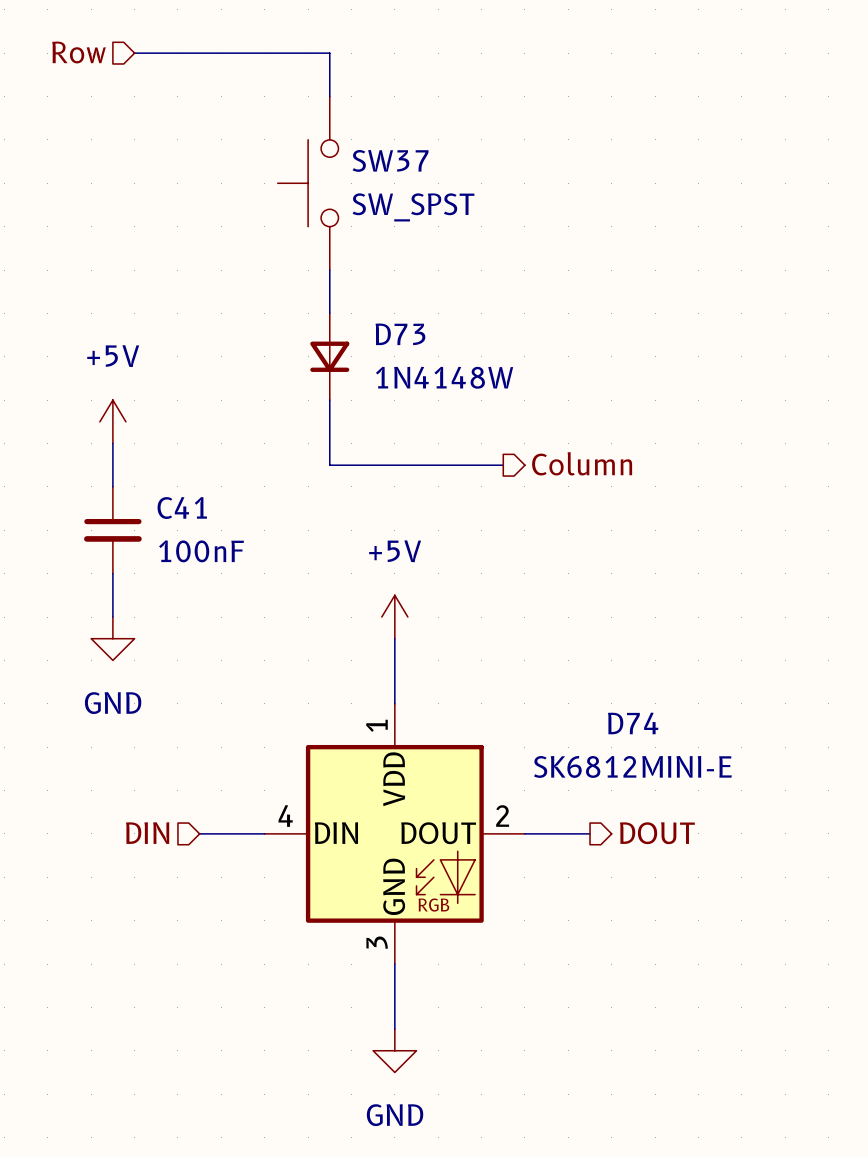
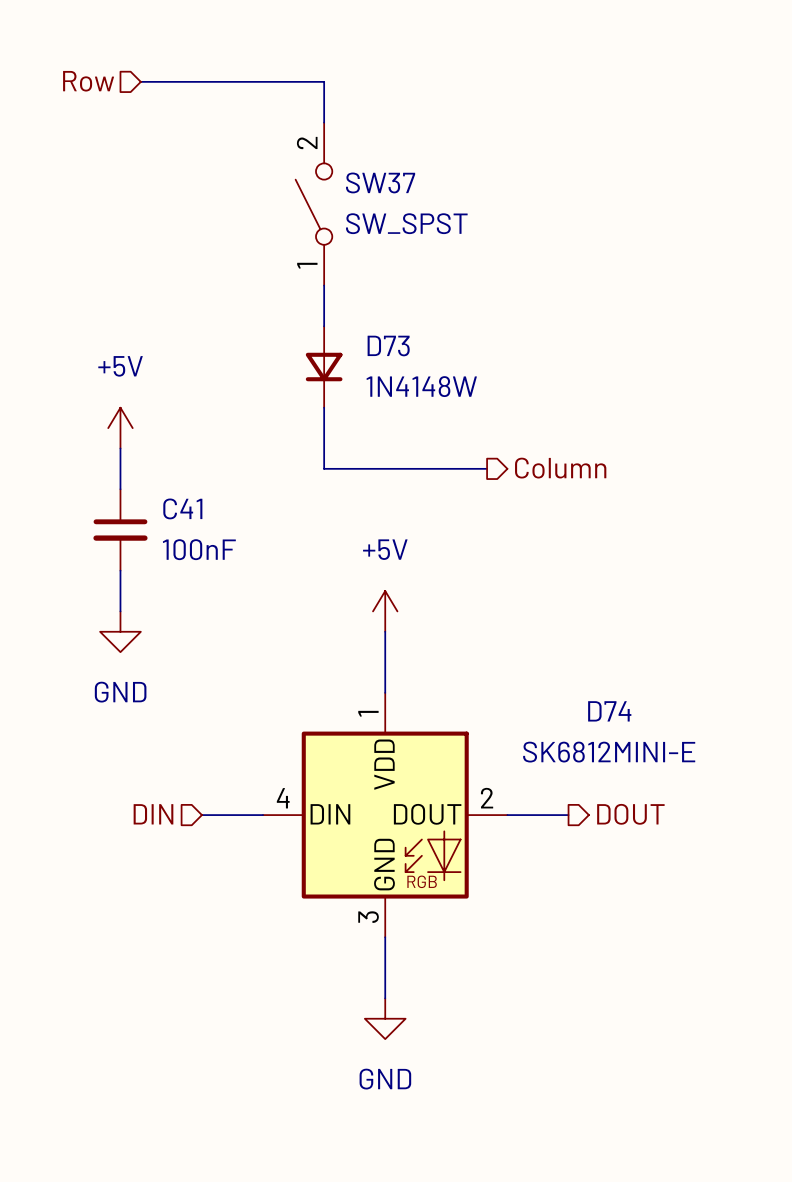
SW37 symbol: [277, 96, 339, 271] -> [295, 122, 333, 286]

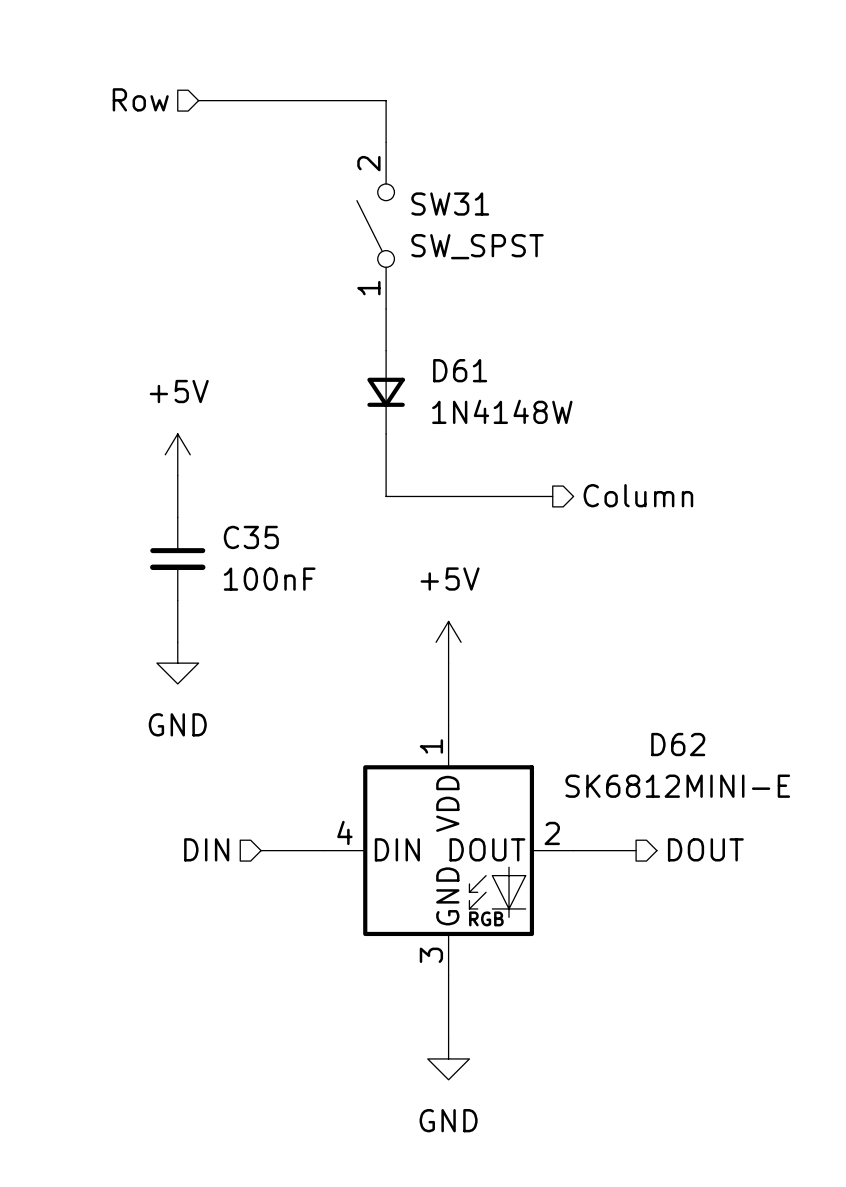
SW37 name: SW37 (380, 182) -> SW31 (450, 204)
D73 name: D73 (388, 346) -> D61 (460, 370)
C41 name: C41 (182, 508) -> C35 (251, 537)
D74 name: D74 (609, 711) -> D62 (678, 744)

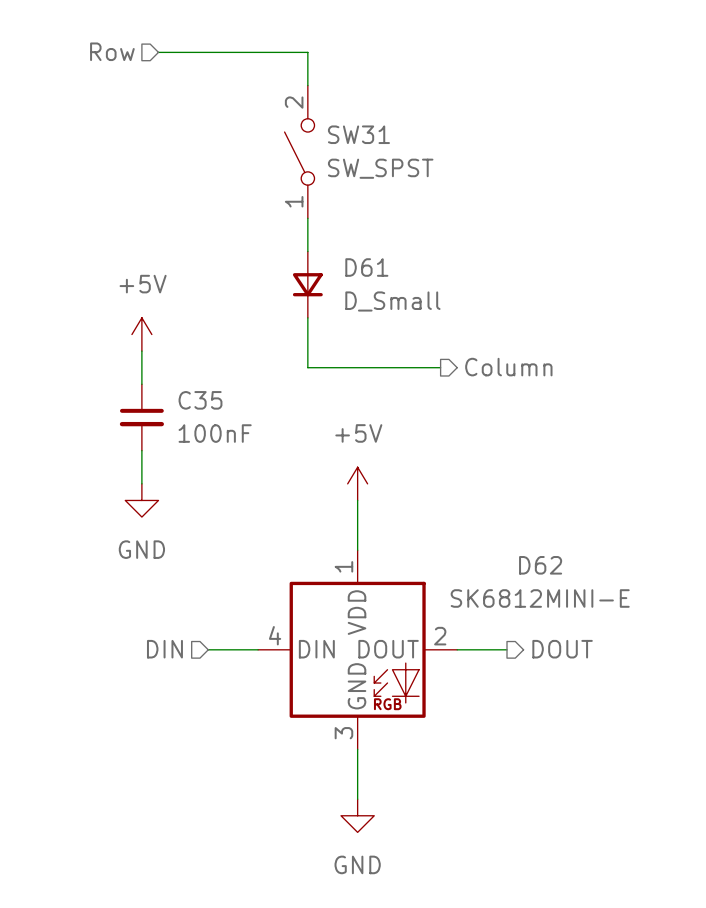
D61 value: 1N4148W (502, 411) -> D_Small (392, 301)

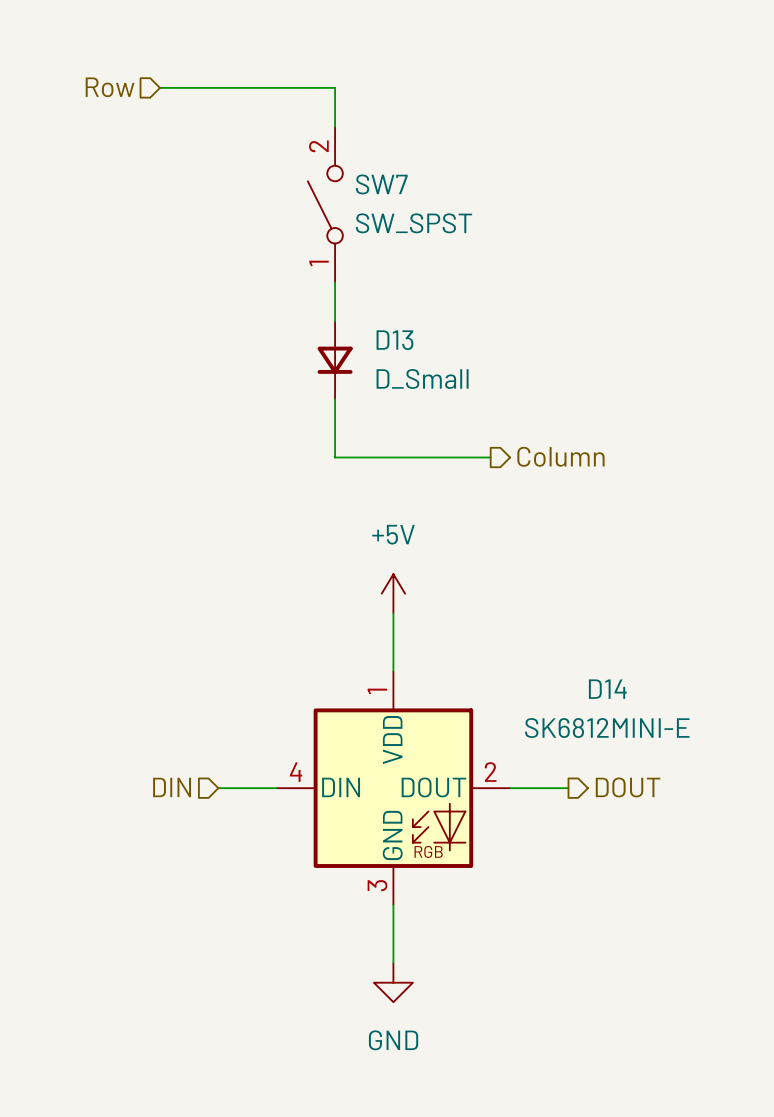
SW31 name: SW31 (358, 134) -> SW7 (381, 184)
D61 name: D61 (366, 267) -> D13 (394, 340)
power symbol: +5V (141, 334) -> none
wire: (141, 351) (141, 384) -> none
C35: 100nF (141, 417) -> none
wire: (141, 450) (141, 483) -> none
power symbol: GND (141, 500) -> none
D62 name: D62 (540, 565) -> D14 (607, 689)

